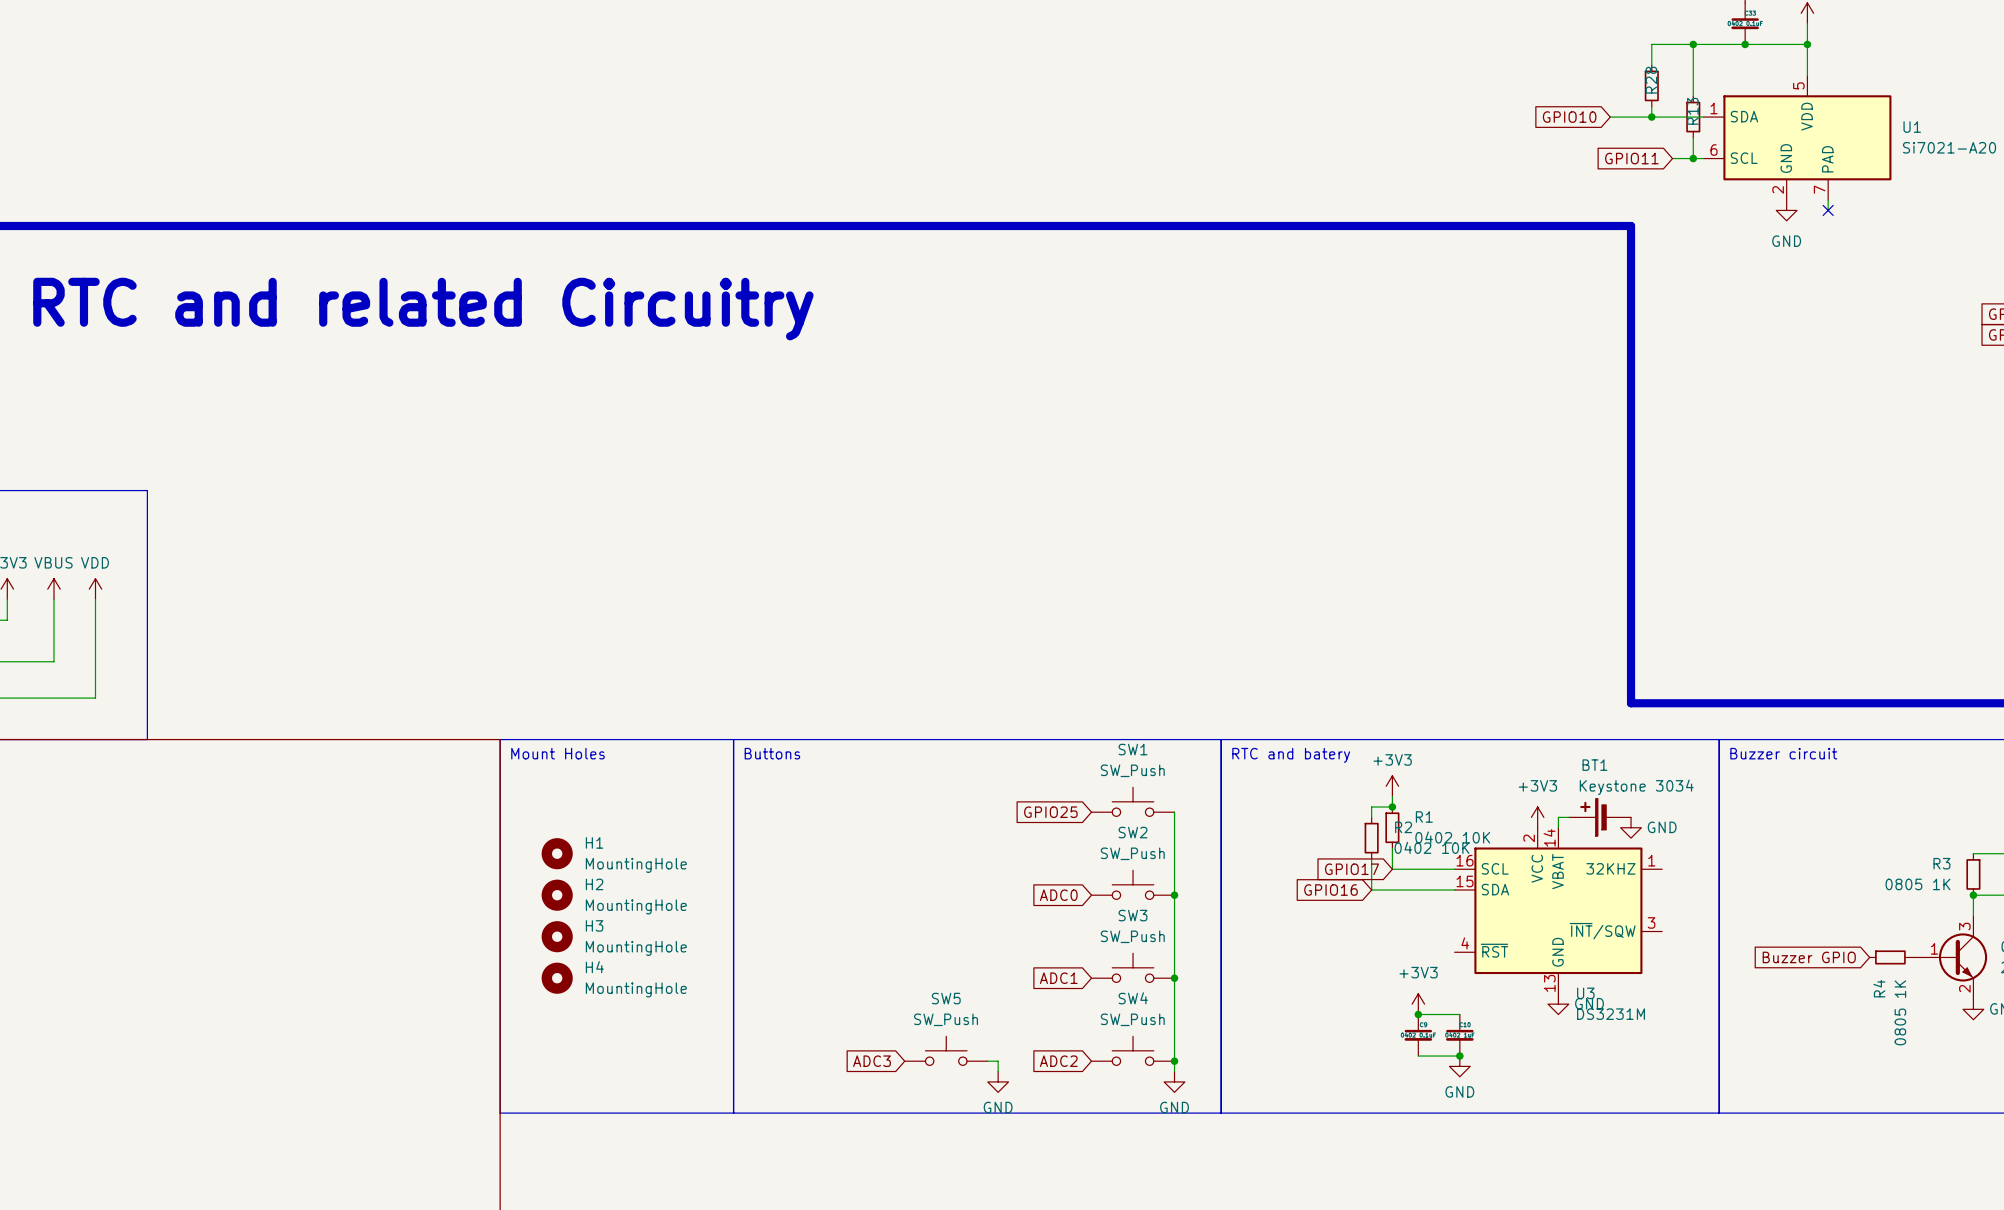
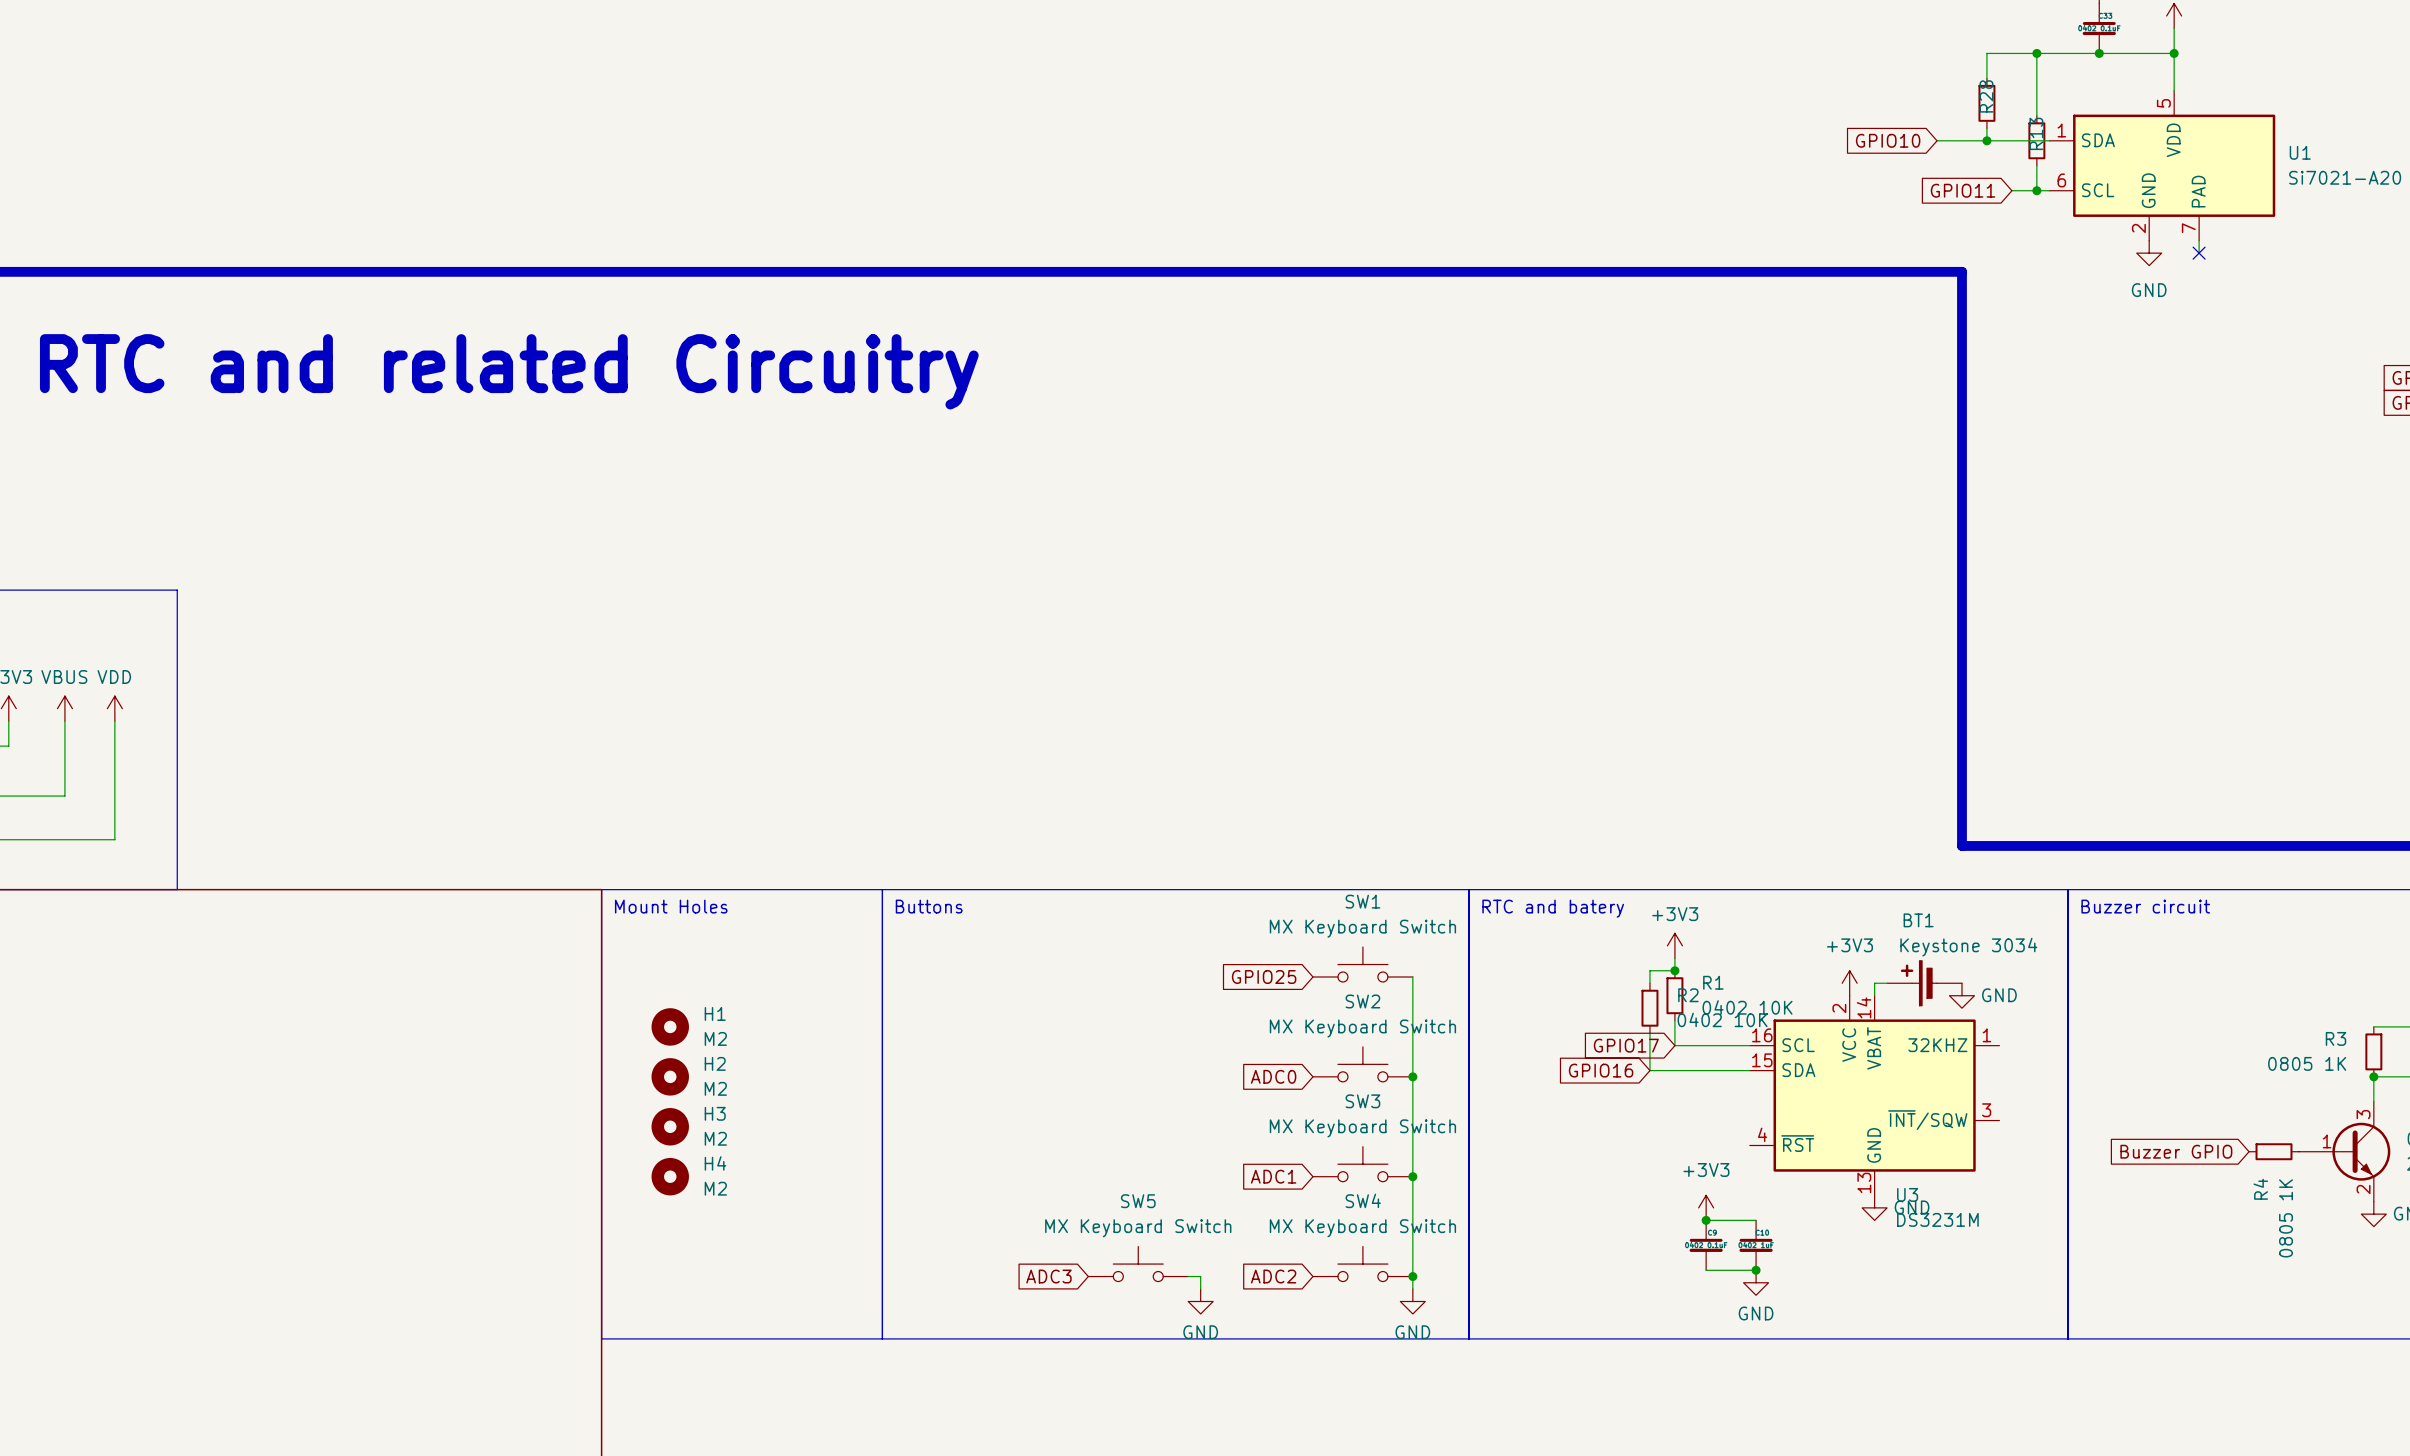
SW1 value: SW_Push (1132, 770) -> MX Keyboard Switch (1362, 928)
SW2 value: SW_Push (1132, 853) -> MX Keyboard Switch (1362, 1028)
H1 value: MountingHole (636, 865) -> M2 (715, 1038)
H2 value: MountingHole (636, 906) -> M2 (715, 1088)
SW3 value: SW_Push (1132, 936) -> MX Keyboard Switch (1362, 1128)
H3 value: MountingHole (636, 948) -> M2 (715, 1138)
H4 value: MountingHole (636, 989) -> M2 (715, 1188)
SW5 value: SW_Push (946, 1019) -> MX Keyboard Switch (1138, 1228)
SW4 value: SW_Push (1132, 1019) -> MX Keyboard Switch (1362, 1228)

